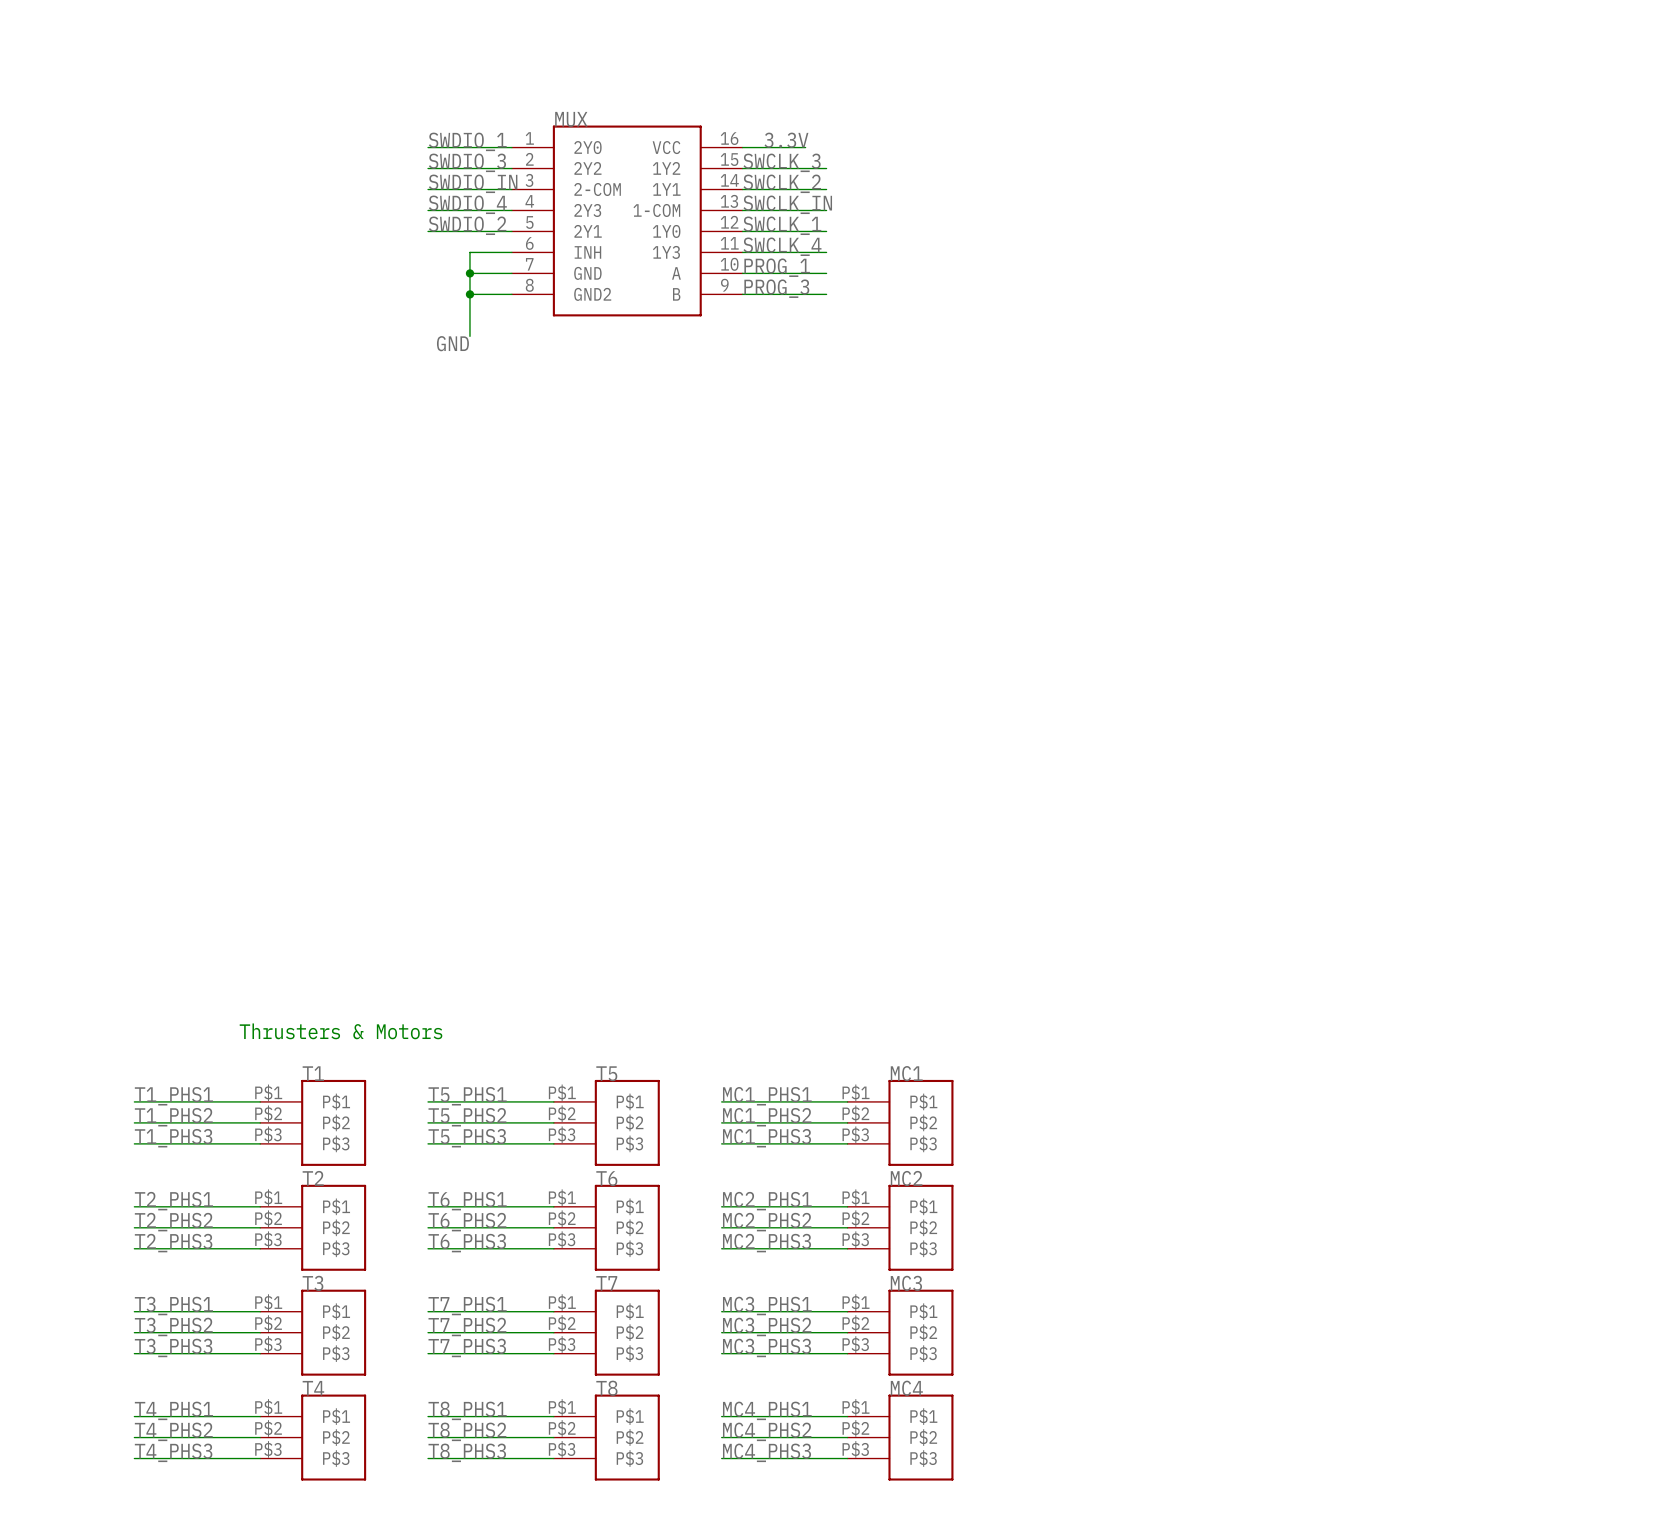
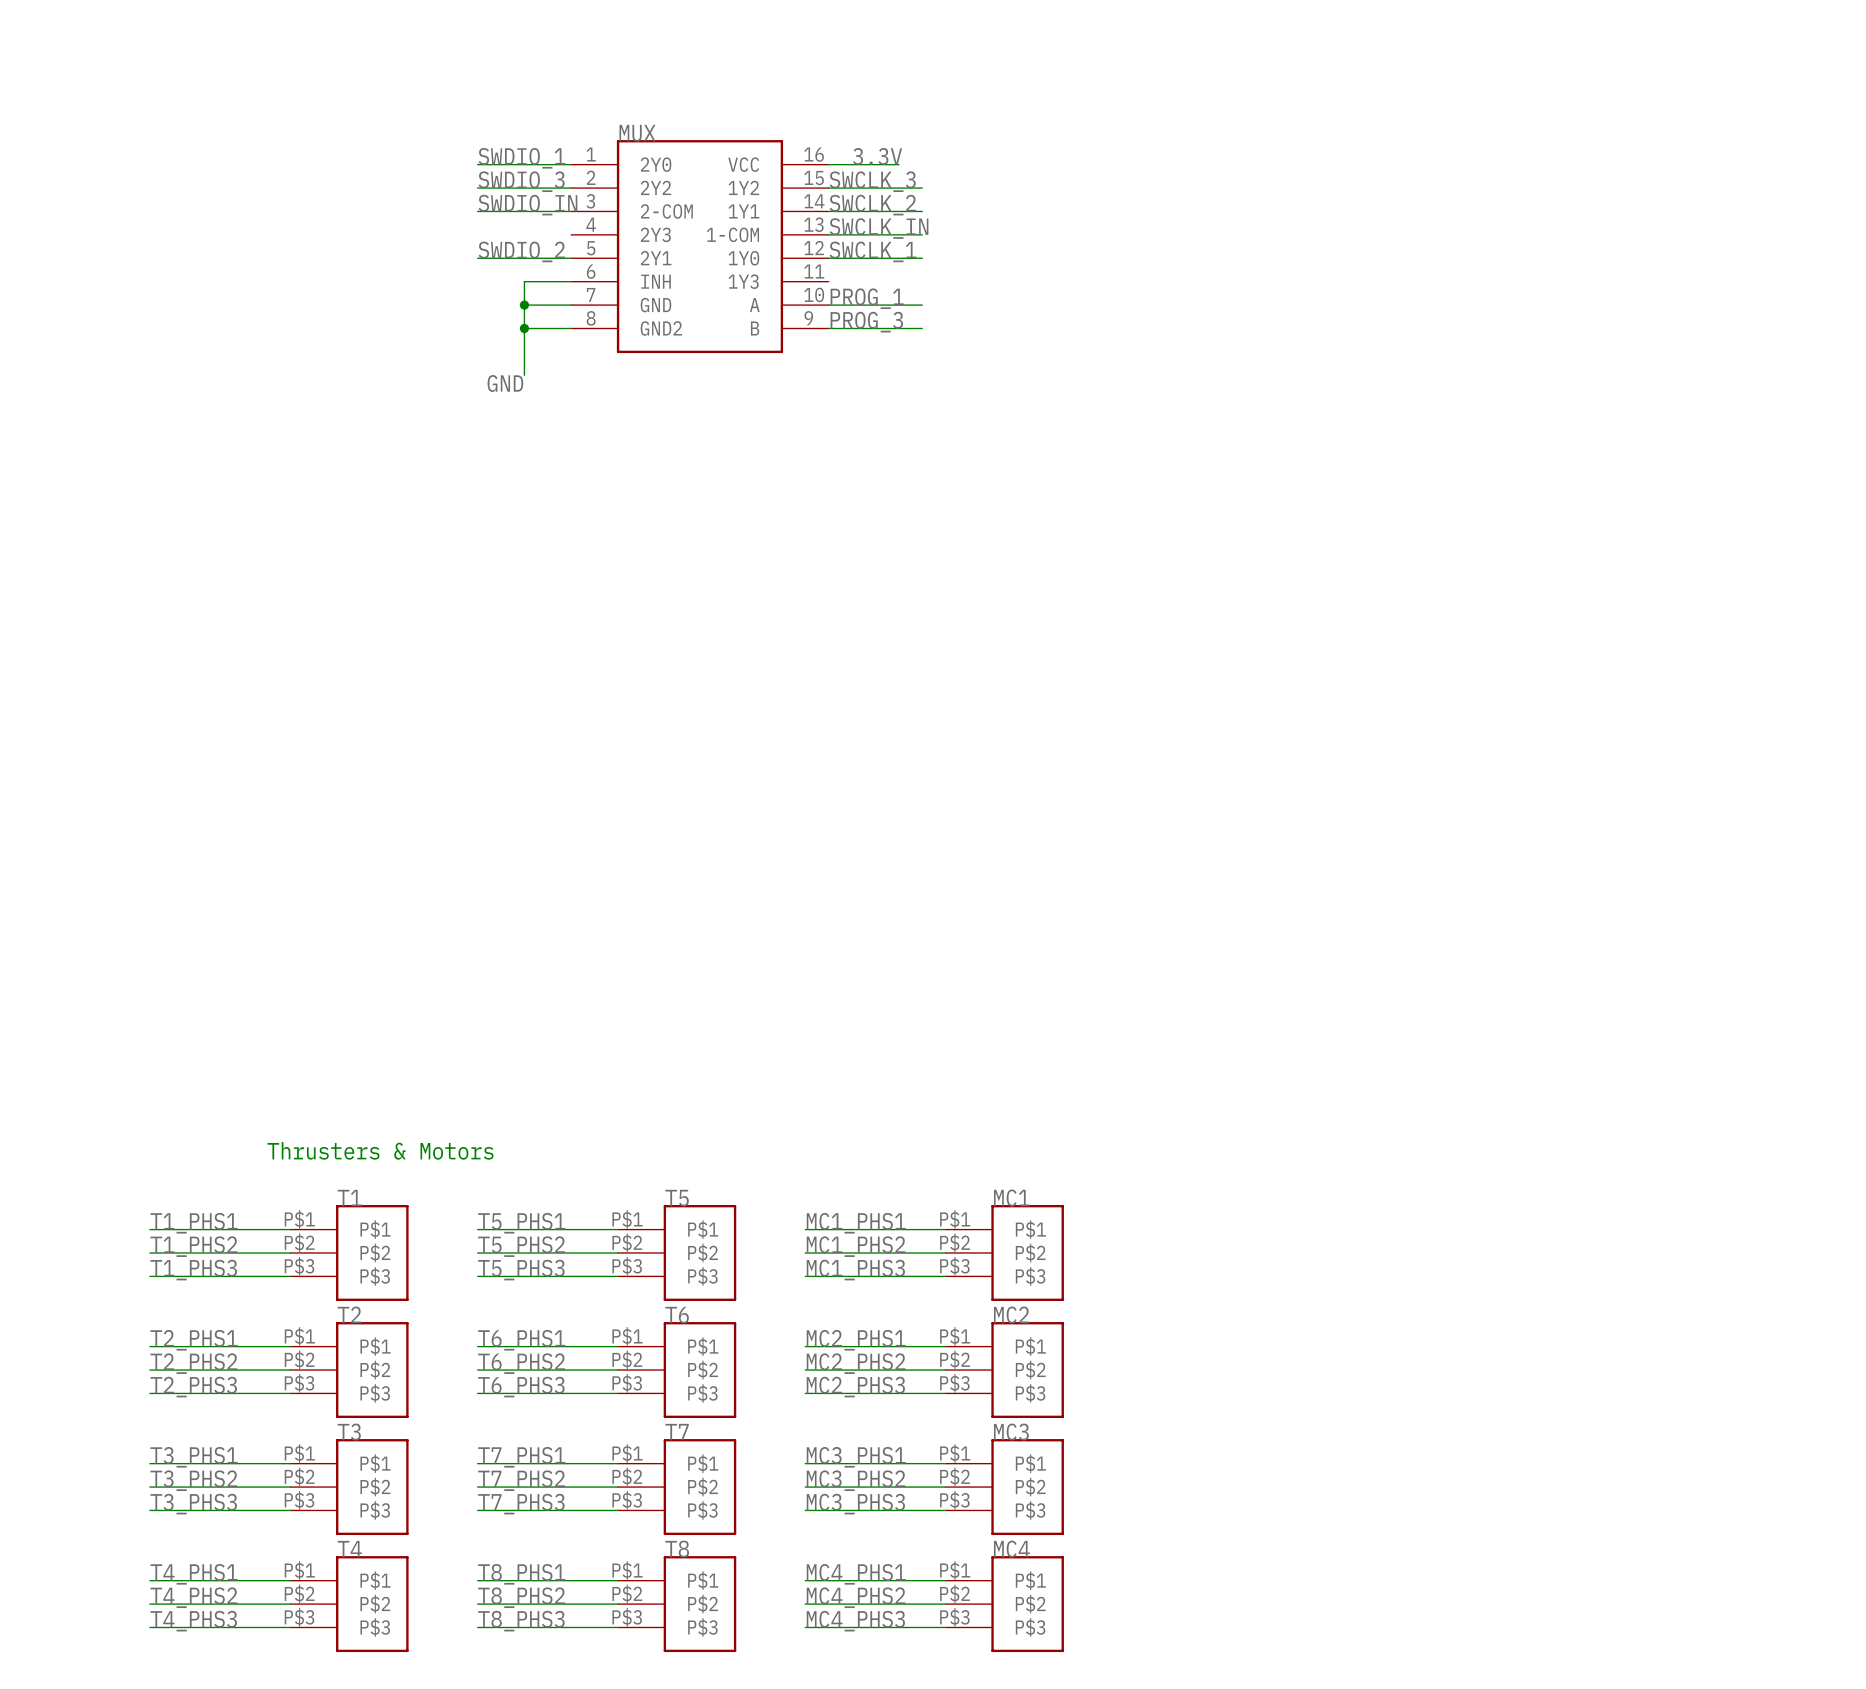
label: SWDIO_4 (467, 204) -> none
wire: (428, 210) (511, 210) -> none
label: SWCLK_4 (782, 246) -> none
wire: (742, 252) (826, 252) -> none

